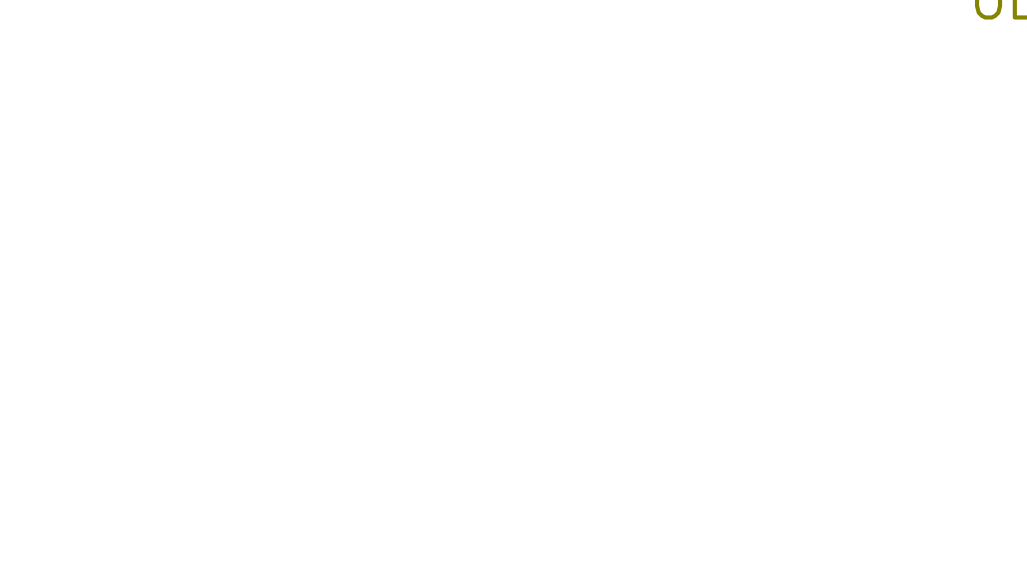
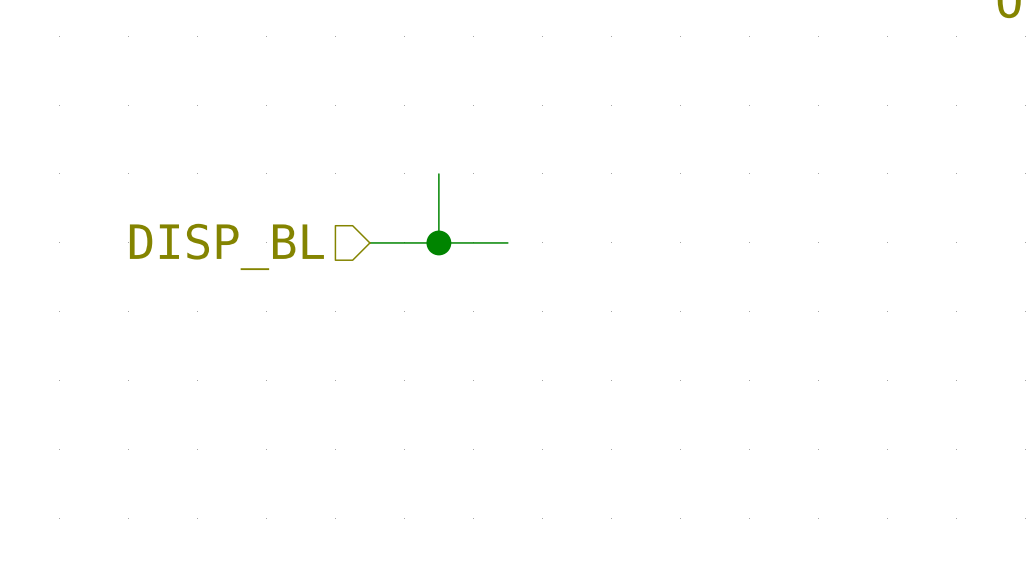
wire: none -> (438, 173) (438, 242)
wire: none -> (369, 242) (507, 242)
junction: none -> (438, 242)
hierarchical label: none -> DISP_BL (226, 246)

